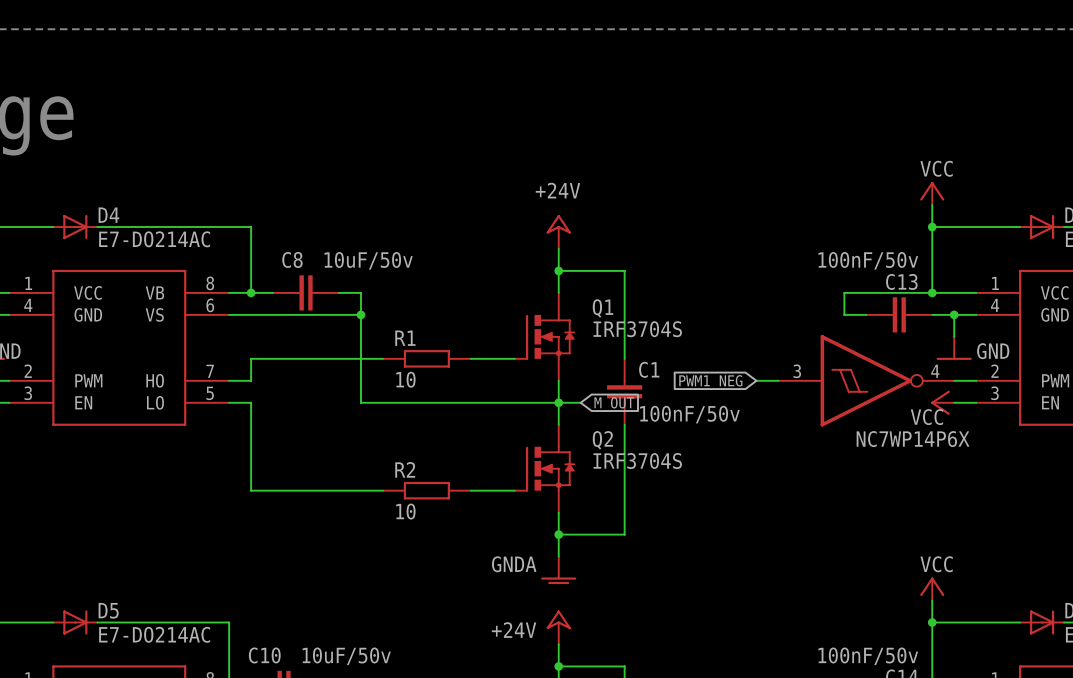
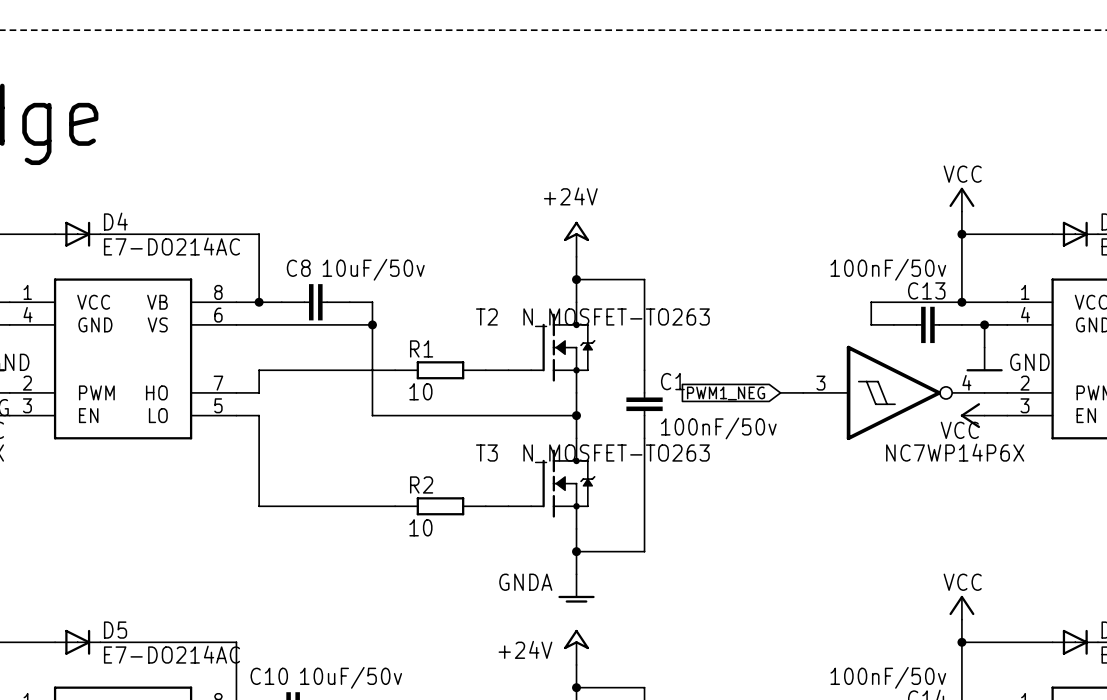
T2: none -> N_MOSFET-TO263 (551, 347)
Q1: IRF3704S (544, 336) -> none
wire: (558, 402) (580, 402) -> none
global label: M_OUT (614, 404) -> none
T3: none -> N_MOSFET-TO263 (551, 483)
Q2: IRF3704S (544, 468) -> none

